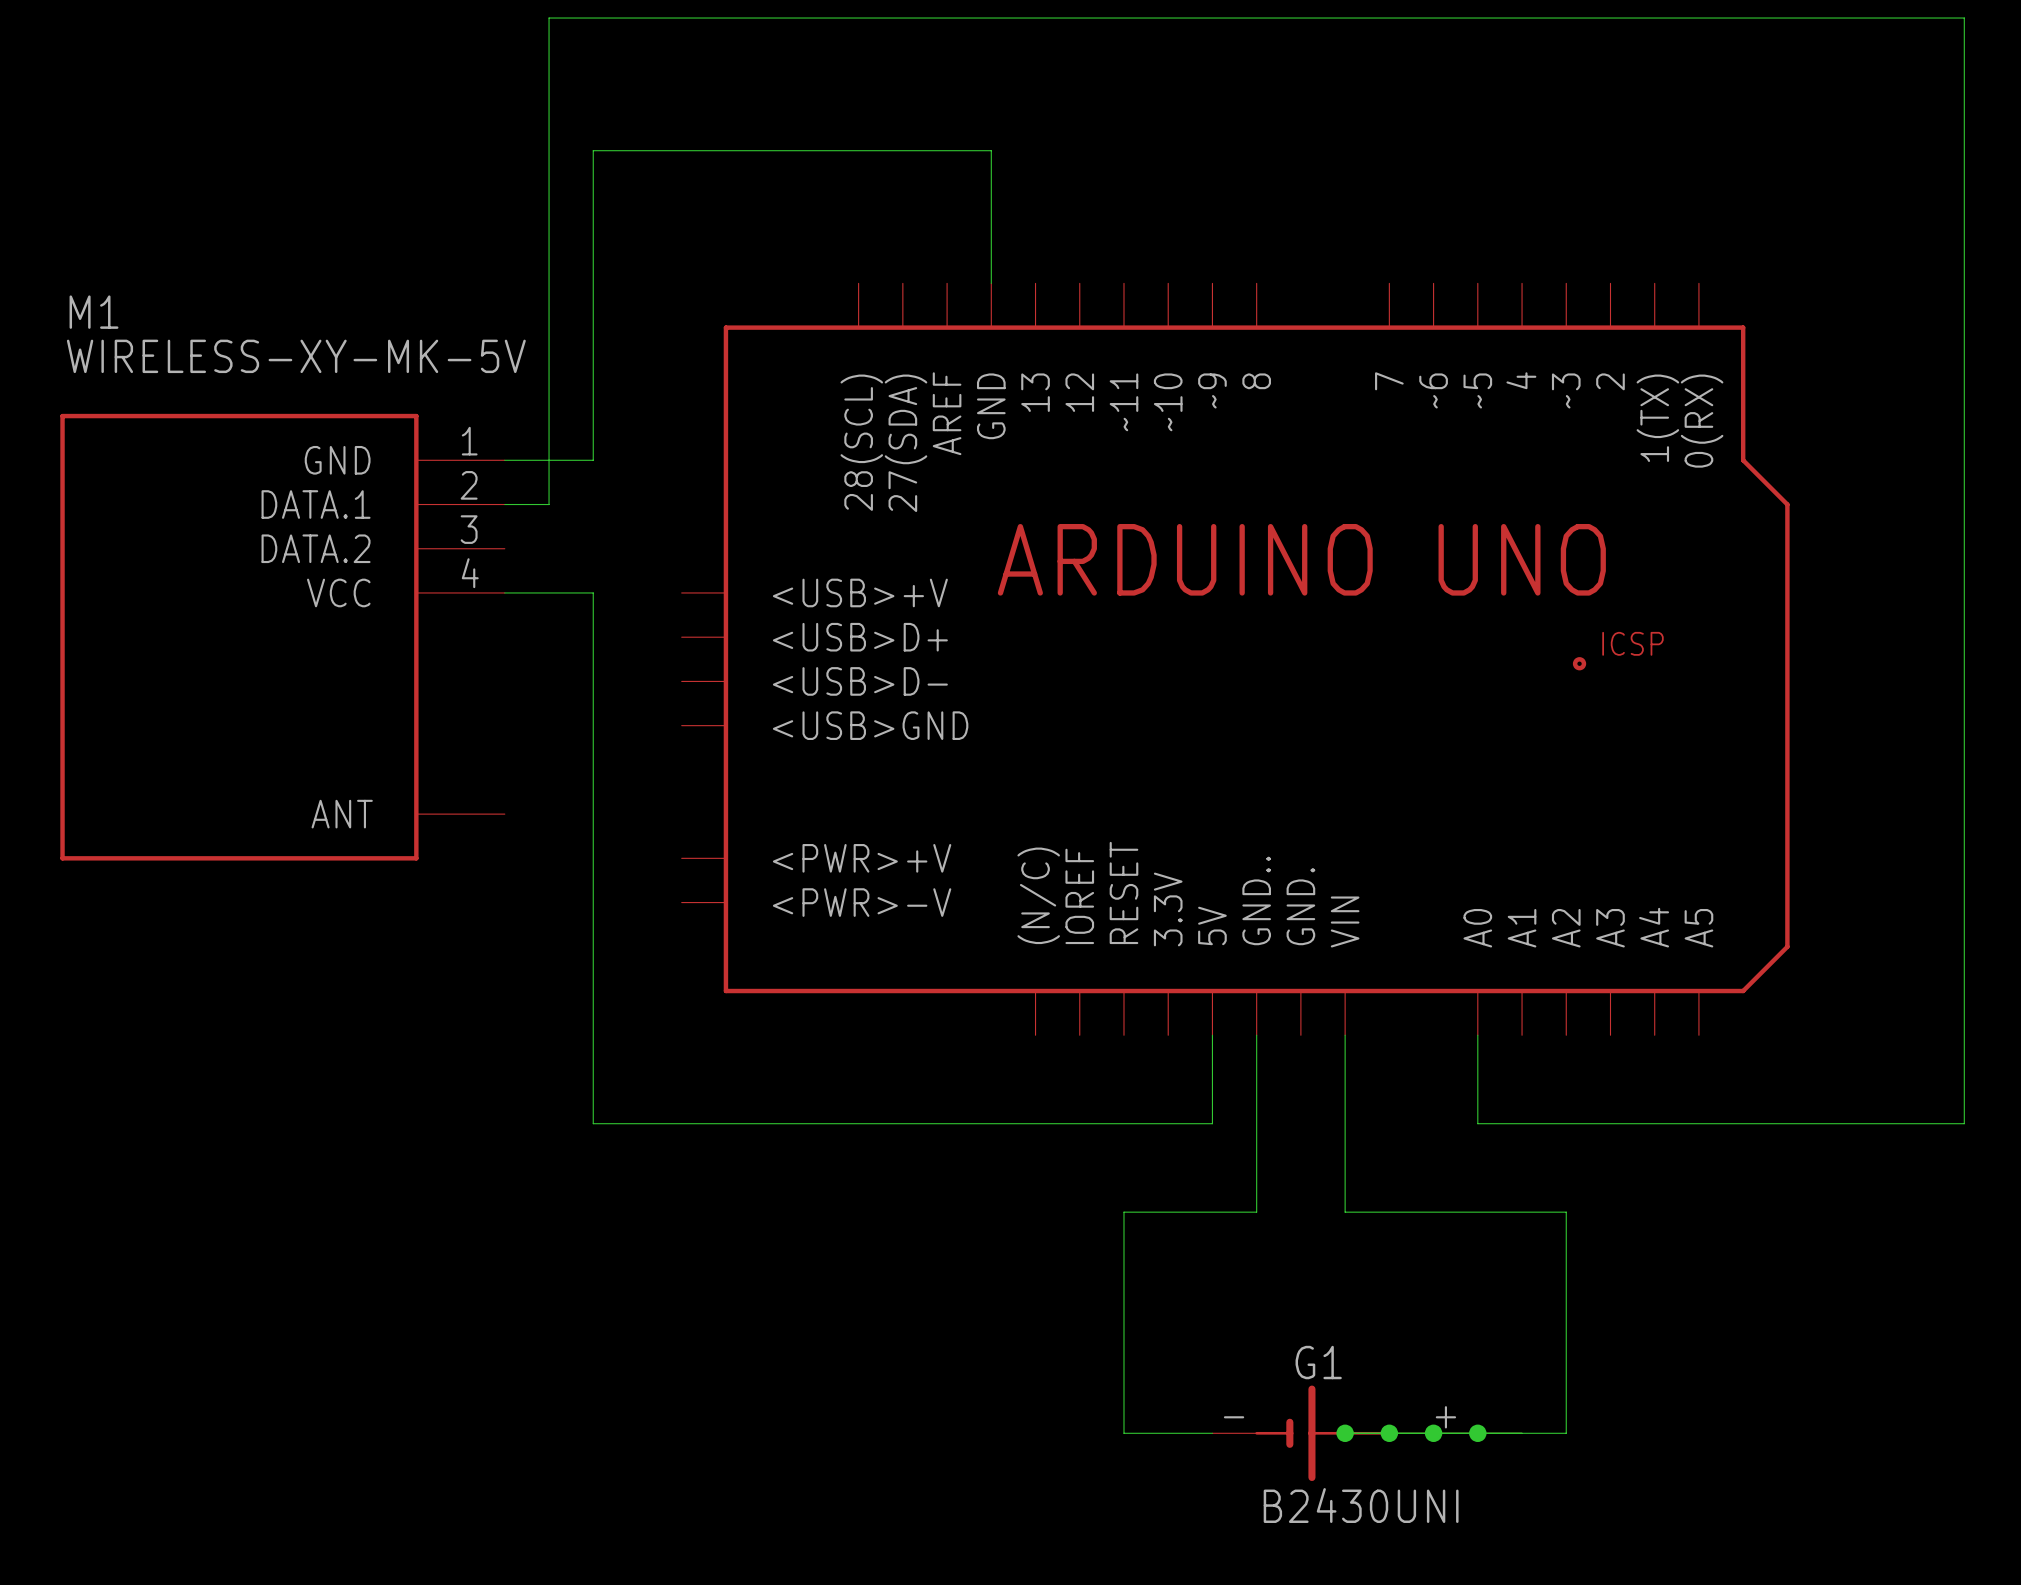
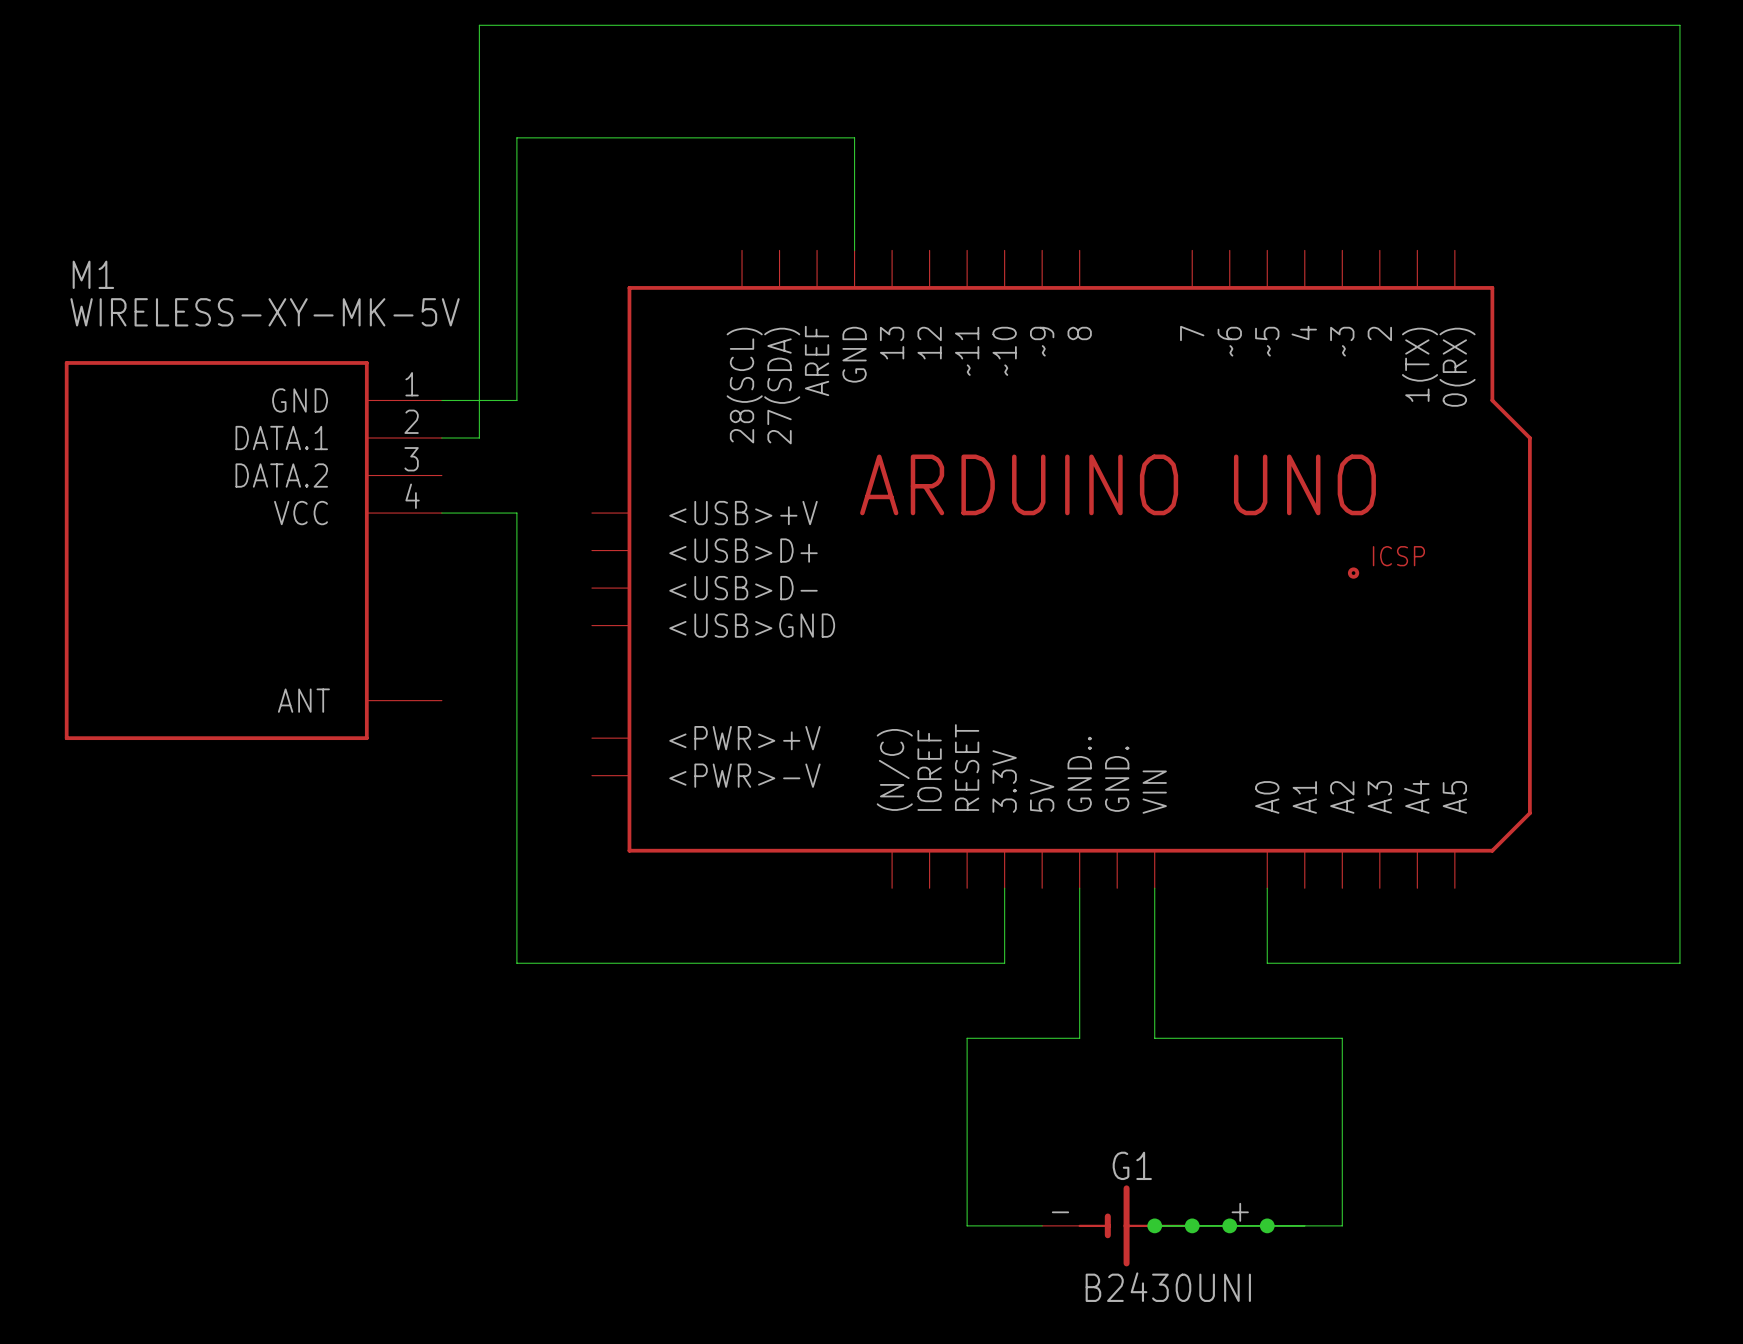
wire: (1212, 1035) (1212, 1123) (1168, 1123) -> (1004, 888) (1004, 963)

